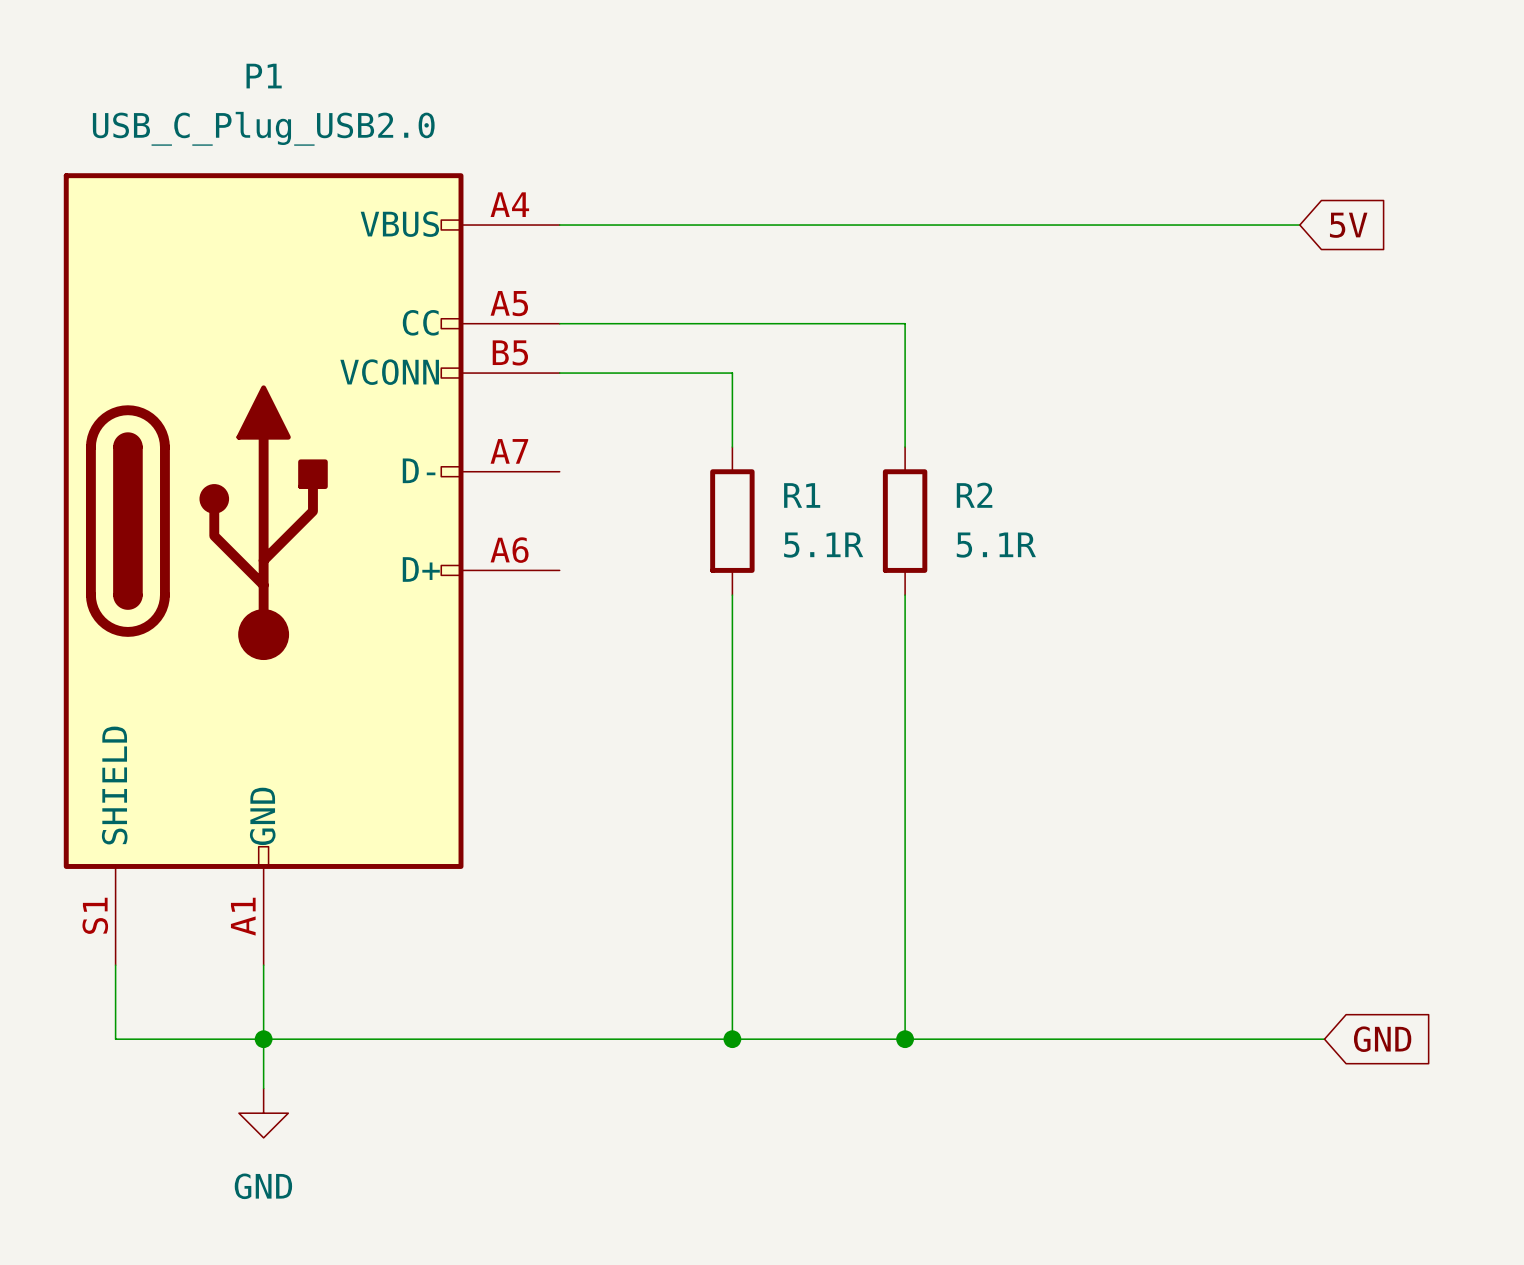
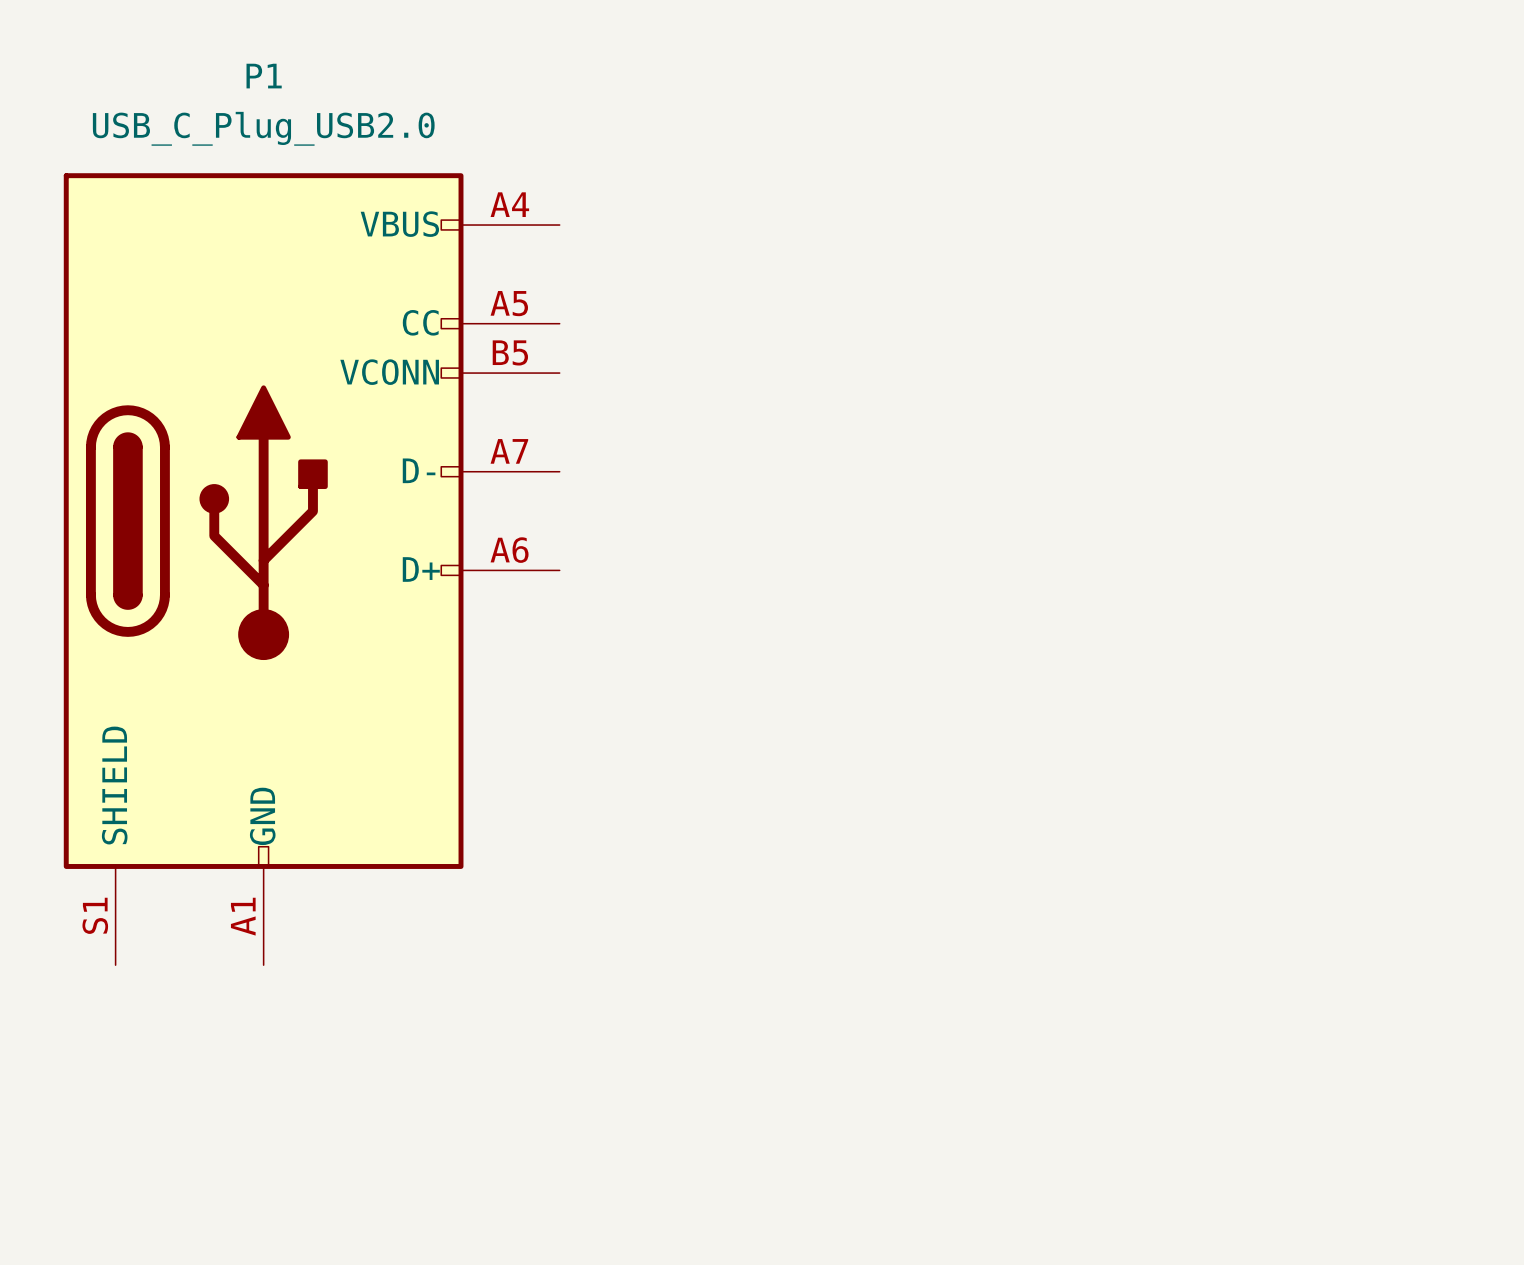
wire: (559, 225) (1299, 225) -> none
global label: 5V (1348, 225) -> none
wire: (559, 323) (905, 323) (905, 447) -> none
wire: (559, 373) (732, 373) (732, 447) -> none
R1: 5.1R (732, 521) -> none
R2: 5.1R (905, 521) -> none
wire: (732, 595) (732, 1039) -> none
wire: (905, 595) (905, 1039) -> none
wire: (115, 965) (115, 1039) (1324, 1039) -> none
wire: (263, 965) (263, 1088) -> none
junction: (263, 1039) -> none
junction: (732, 1039) -> none
junction: (905, 1039) -> none
global label: GND (1382, 1039) -> none
power symbol: GND (263, 1113) -> none

